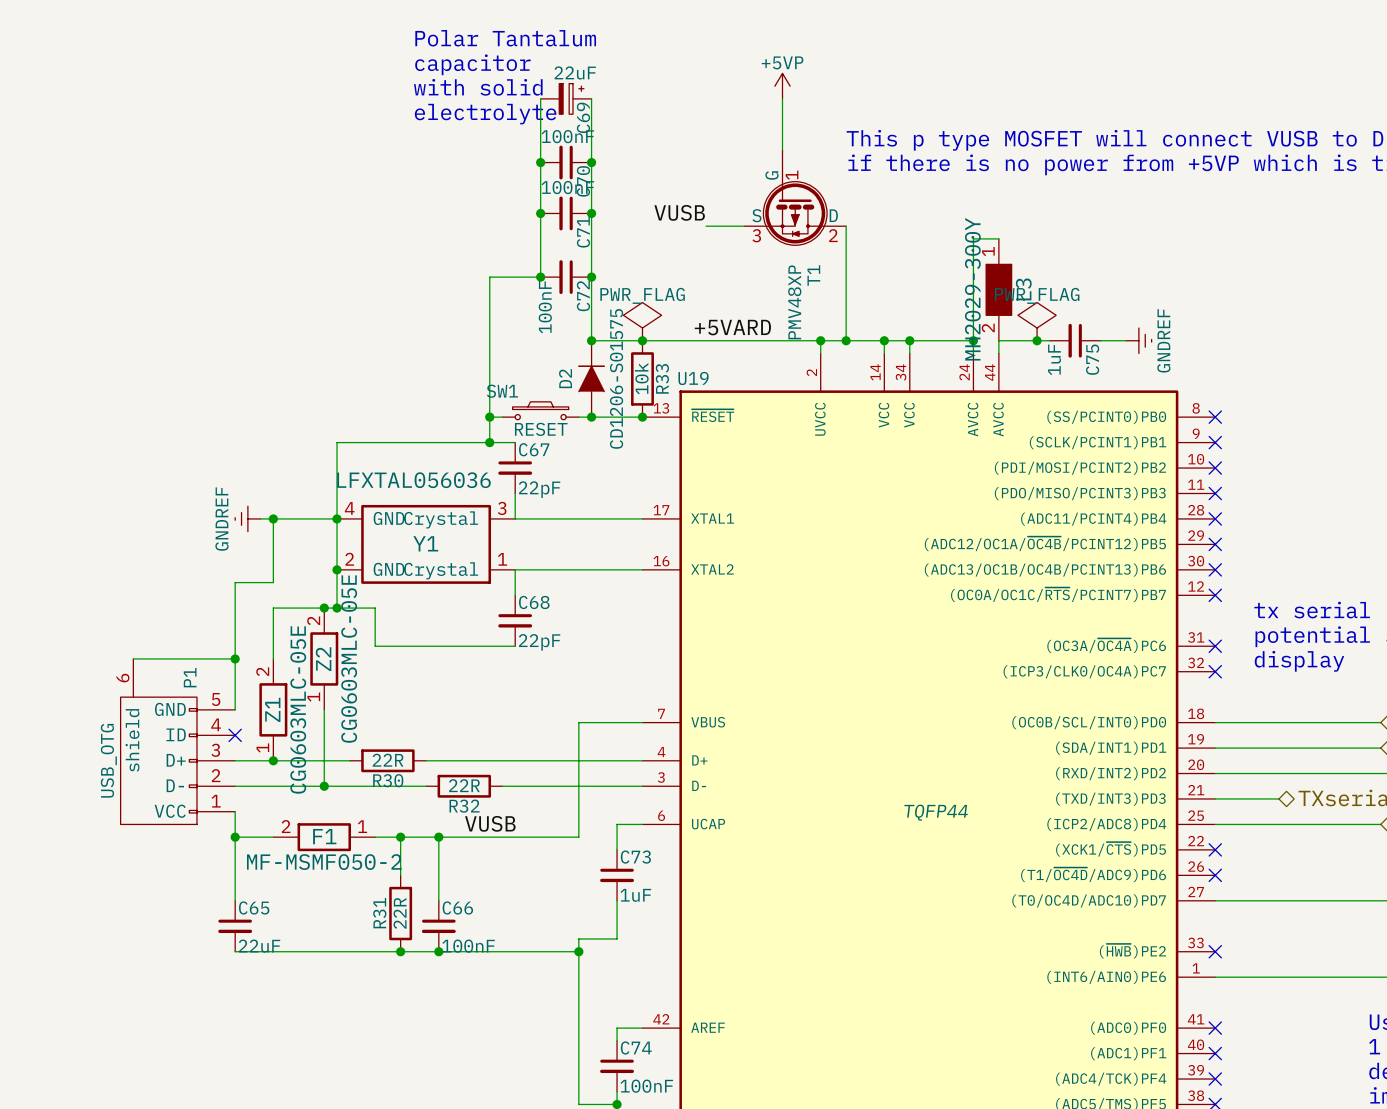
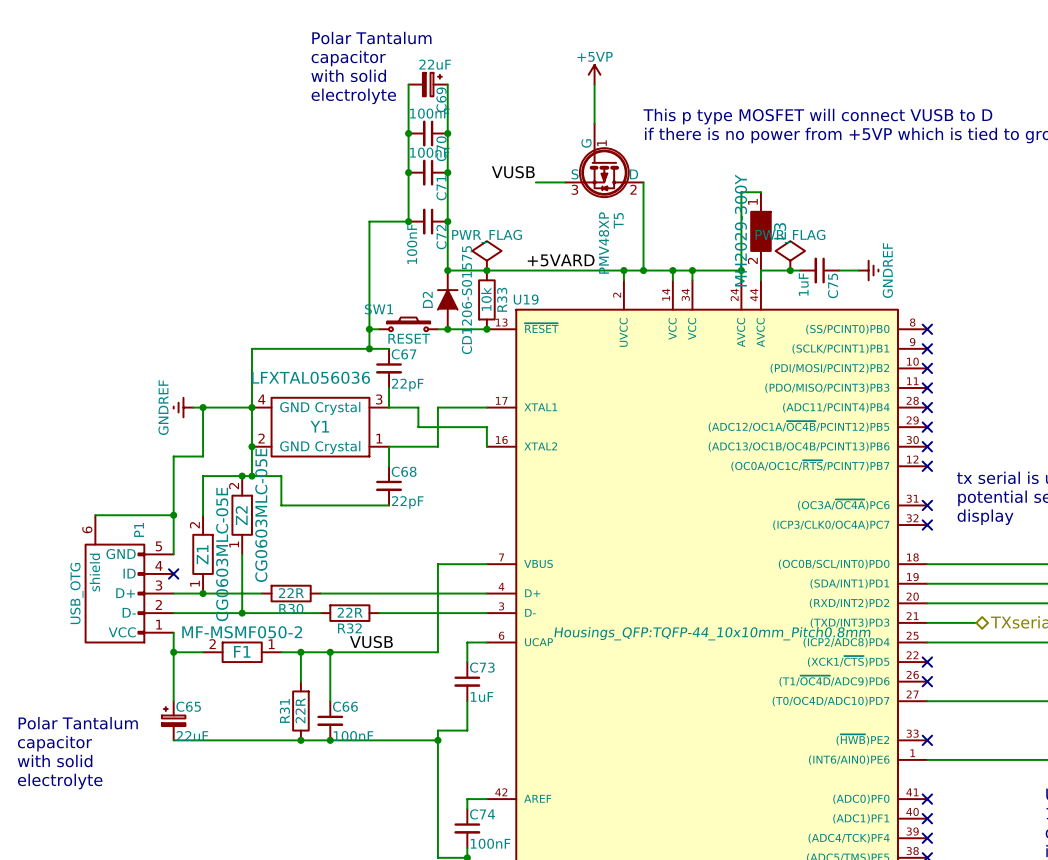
T1 name: T1 (813, 275) -> T5 (618, 220)
wire: (553, 518) (578, 518) -> (437, 446) (437, 407)
wire: (578, 569) (642, 569) -> (418, 407) (418, 427) (486, 427) (486, 446)
U19 text: TQFP44 (936, 812) -> Housings_QFP:TQFP-44_10x10mm_Pitch0.8mm (712, 633)
F1 value position: MF-MSMF050-2 (324, 862) -> MF-MSMF050-2 (242, 632)
C65 symbol: [218, 900, 253, 952] -> [161, 701, 186, 741]
text: none -> Polar Tantalum (78, 723)
text: none -> capacitor (54, 743)
text: none -> with solid (55, 761)
text: none -> electrolyte (60, 781)

